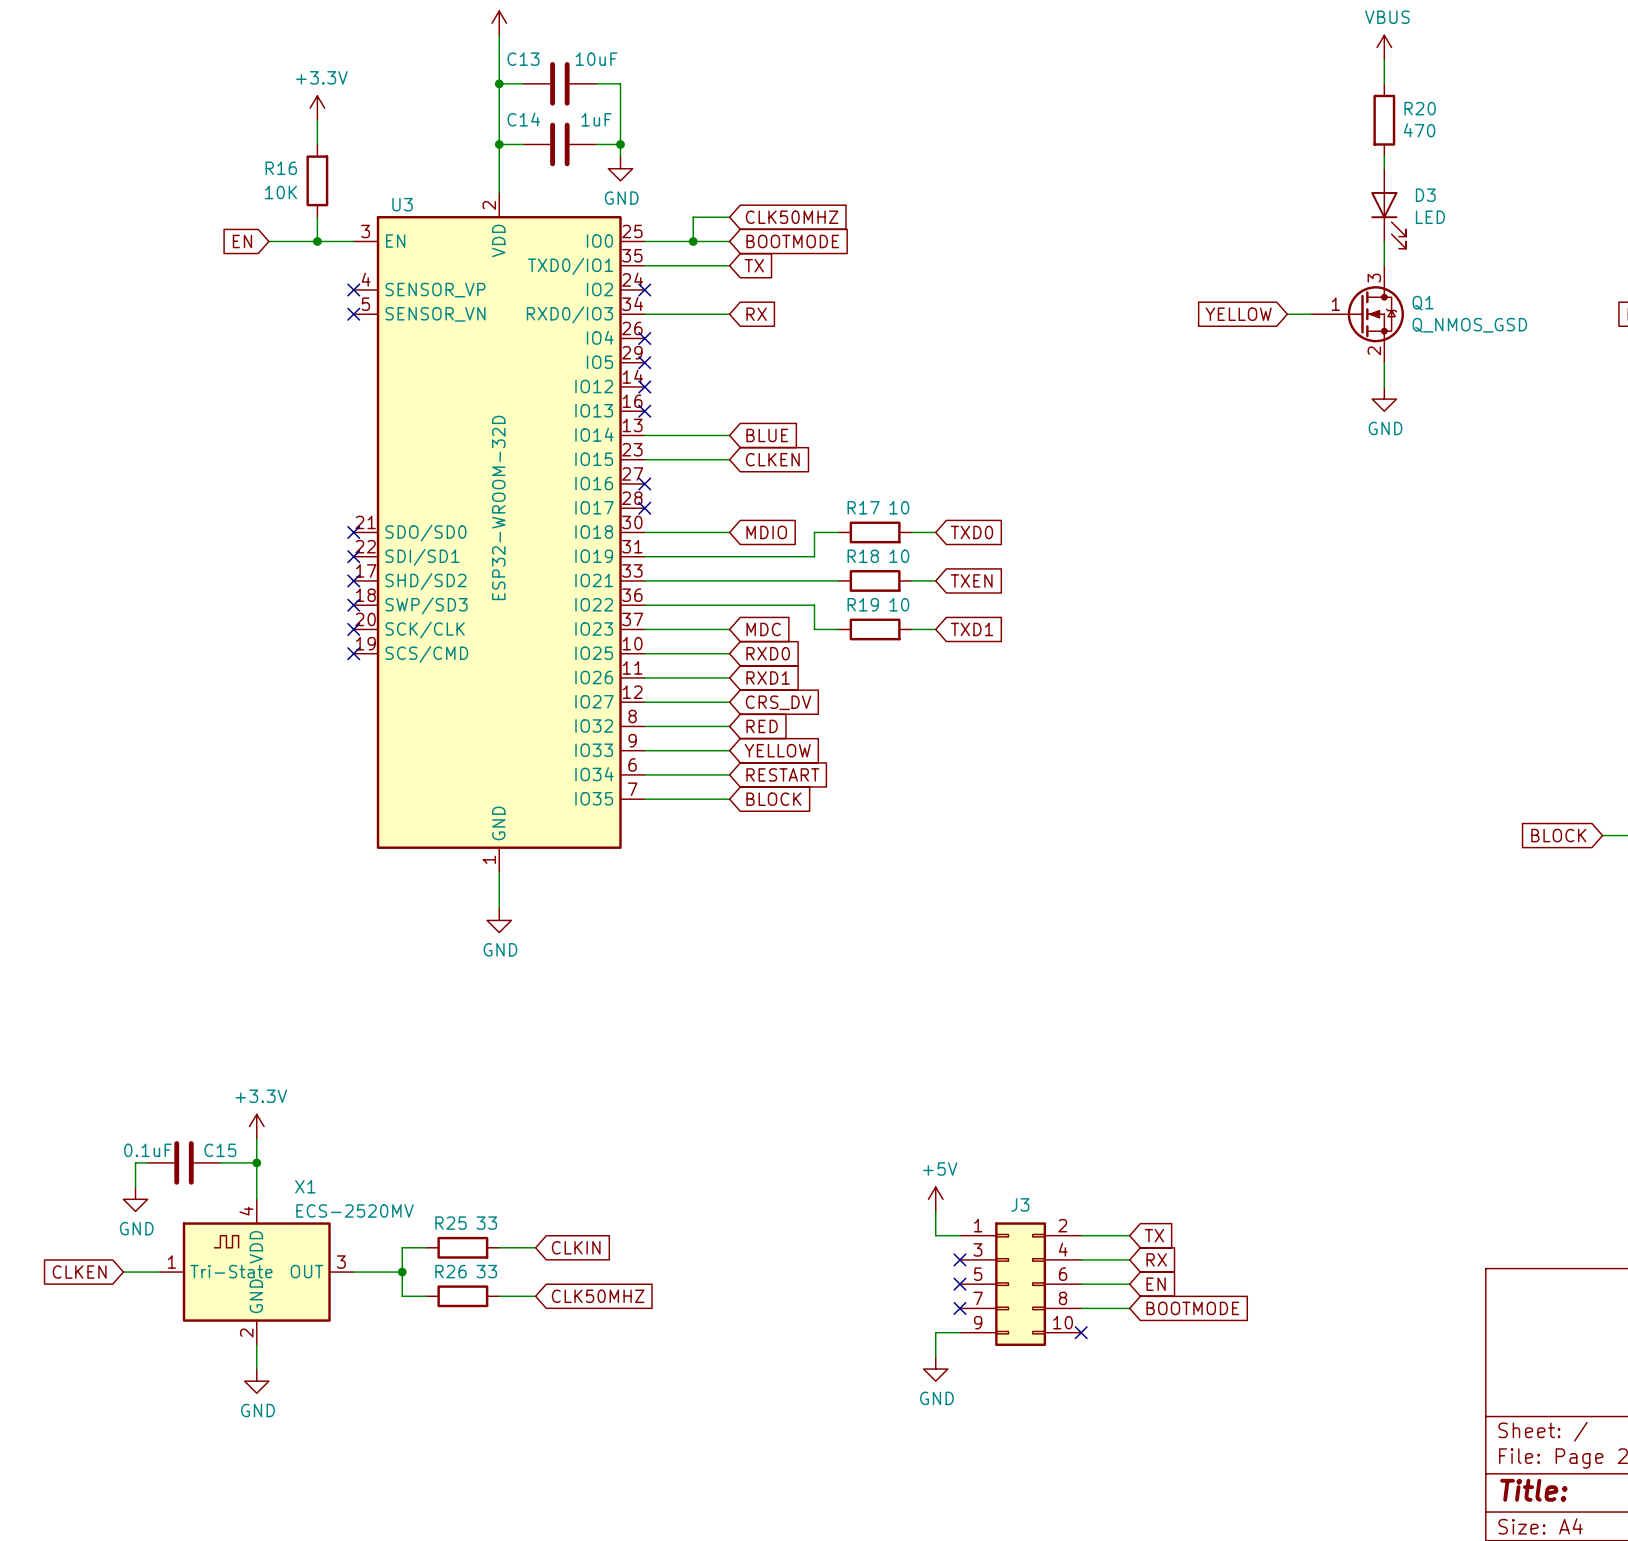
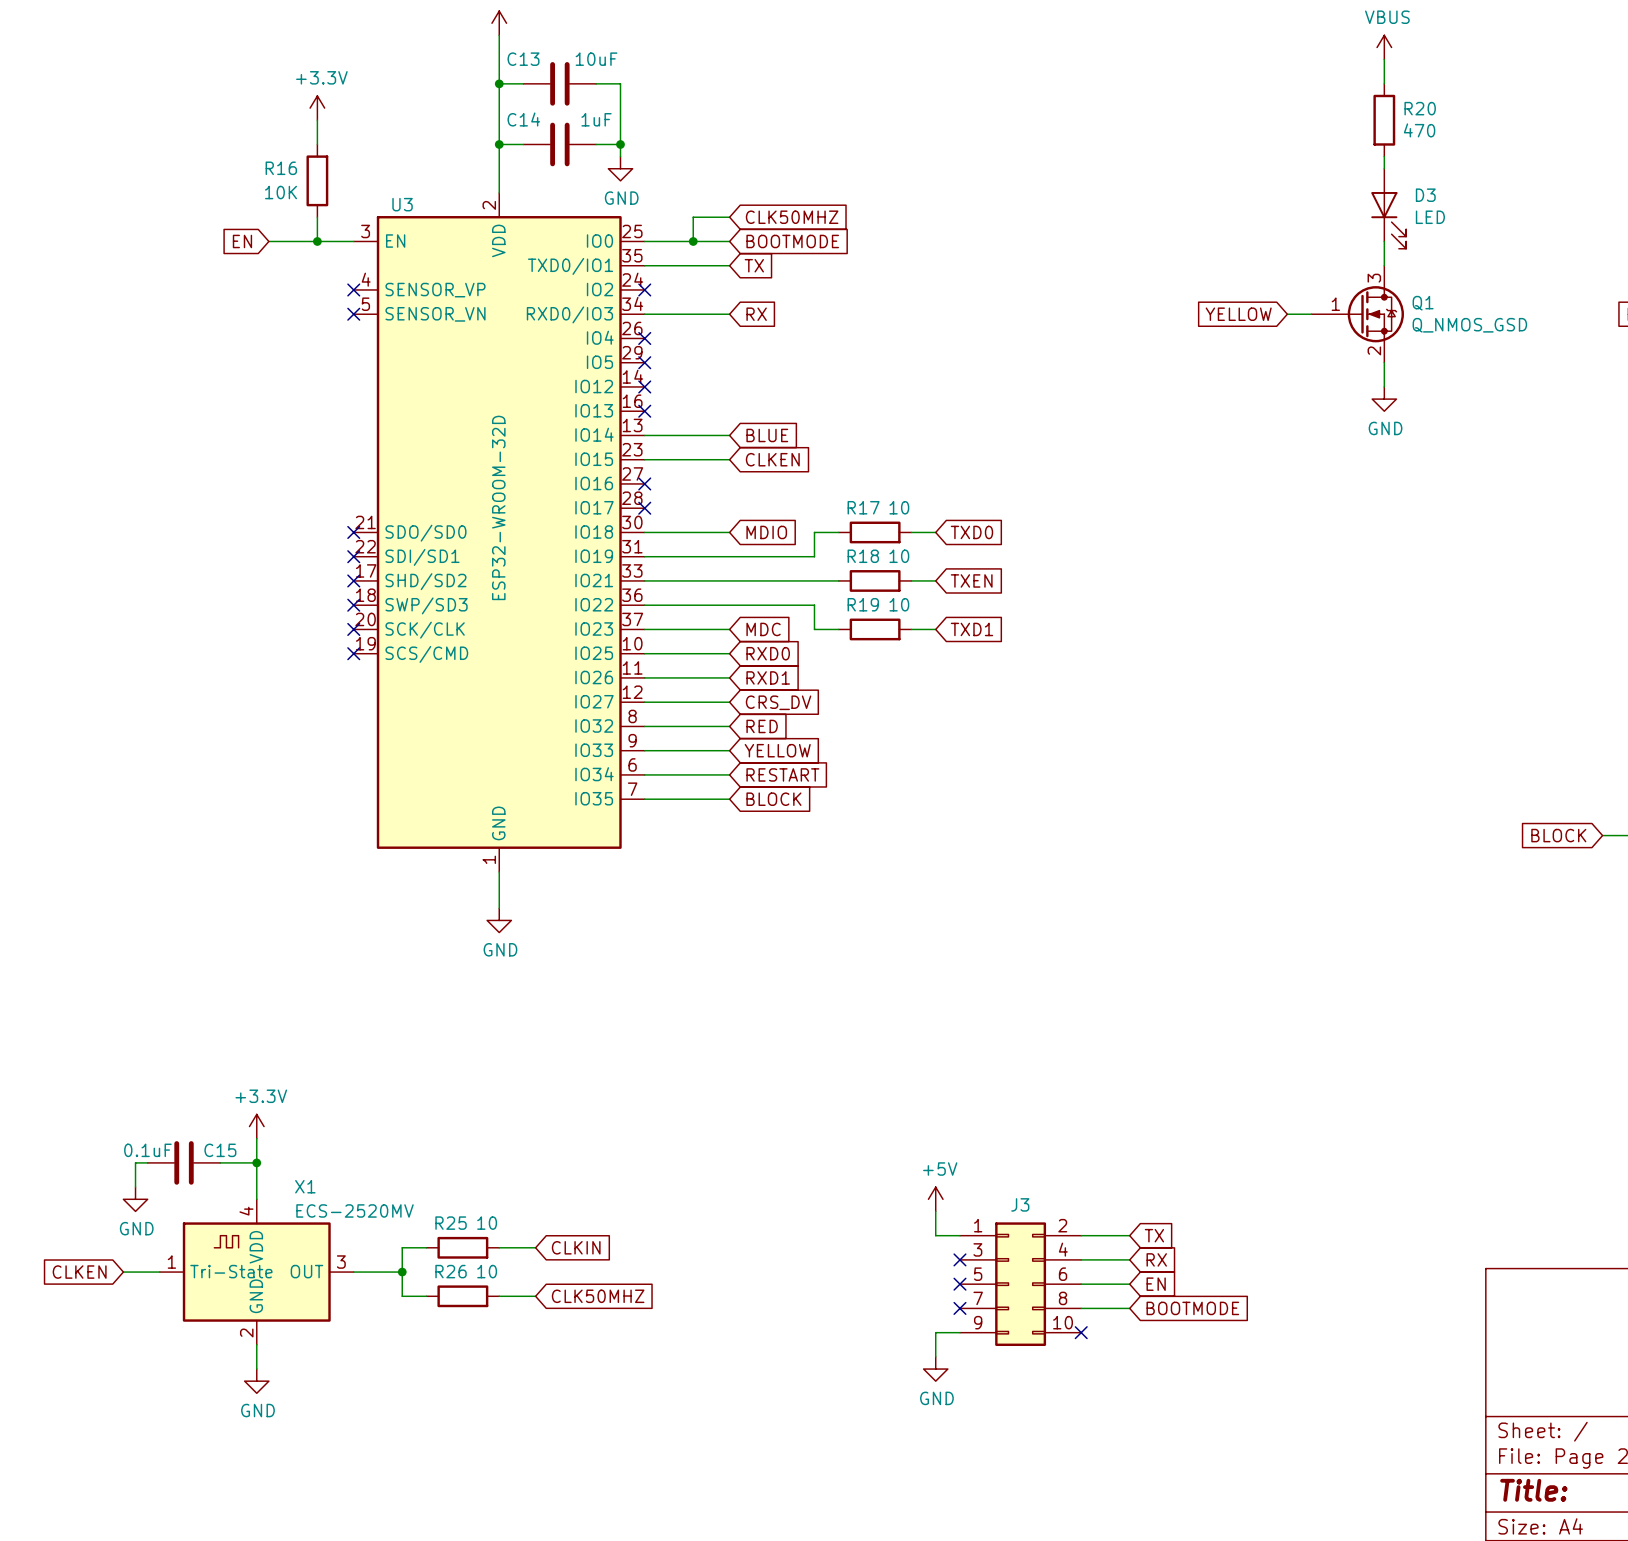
R25 value: 33 (486, 1223) -> 10 (487, 1223)
R26 value: 33 (486, 1271) -> 10 (487, 1271)

